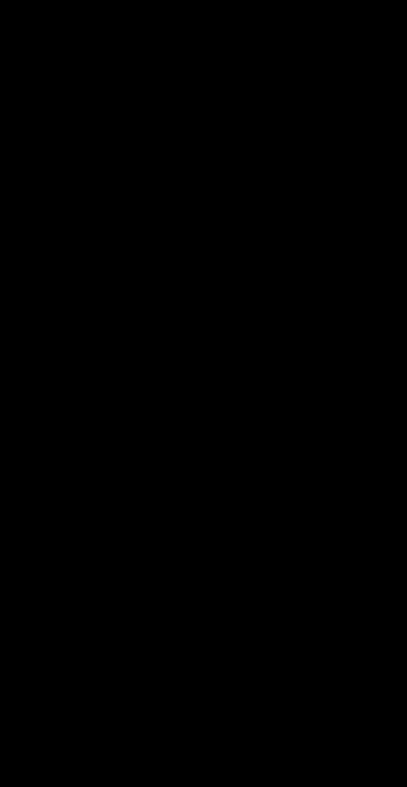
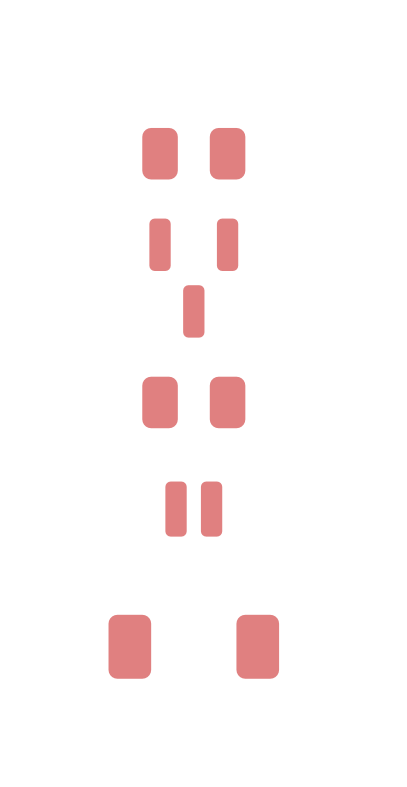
part: none -> (193, 153)
part: none -> (193, 278)
part: none -> (193, 402)
part: none -> (193, 580)

